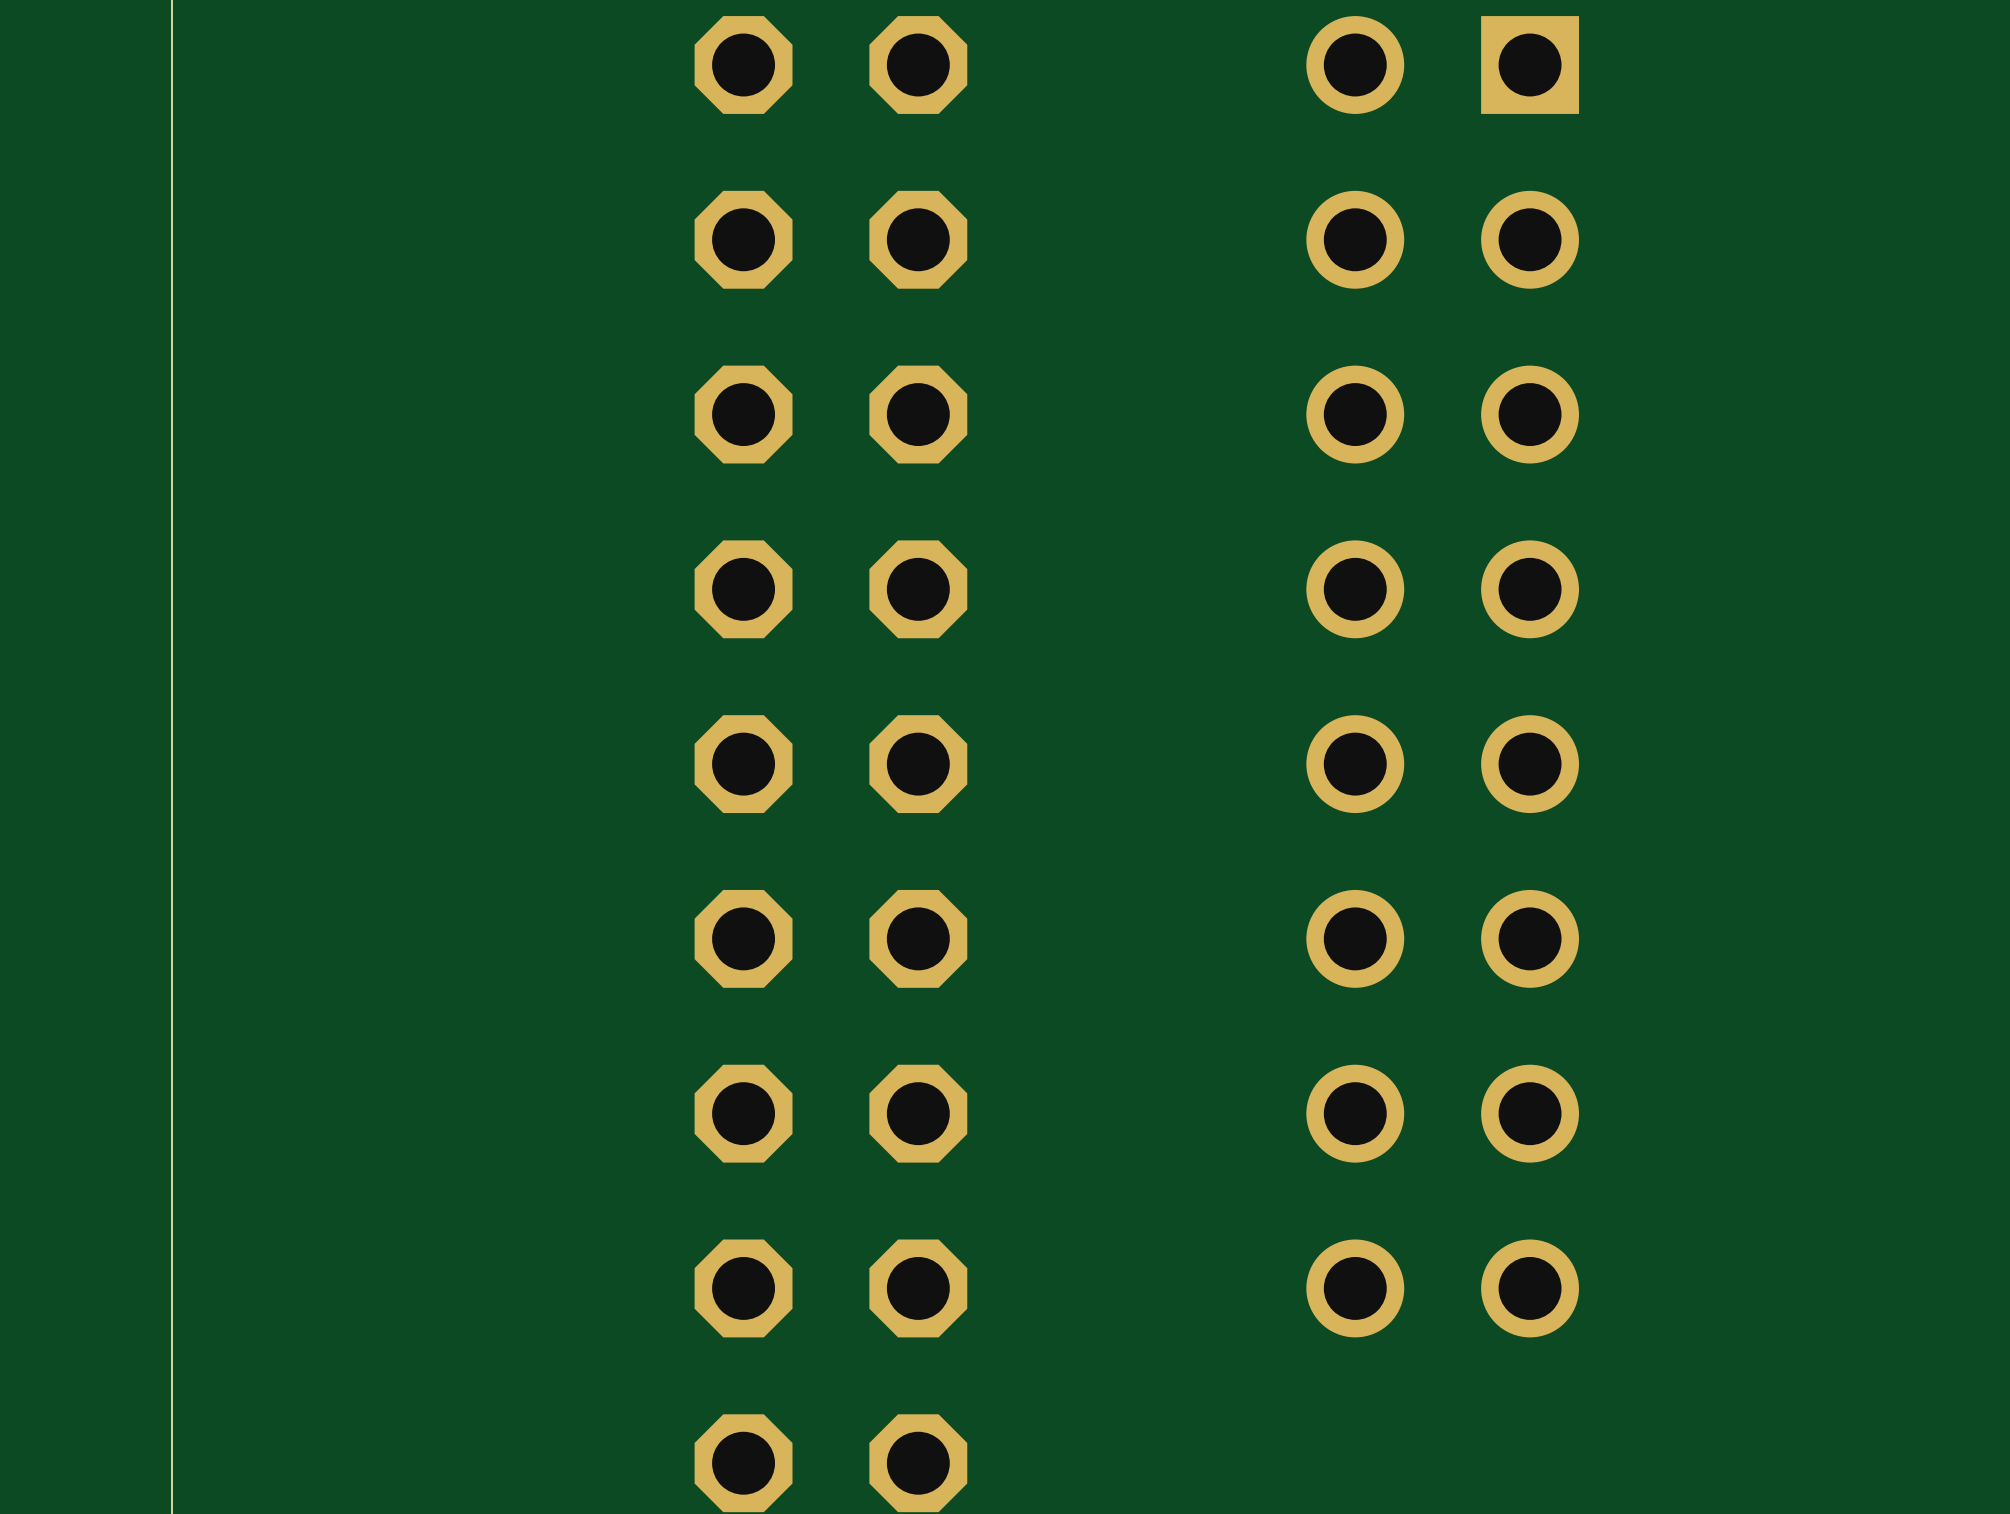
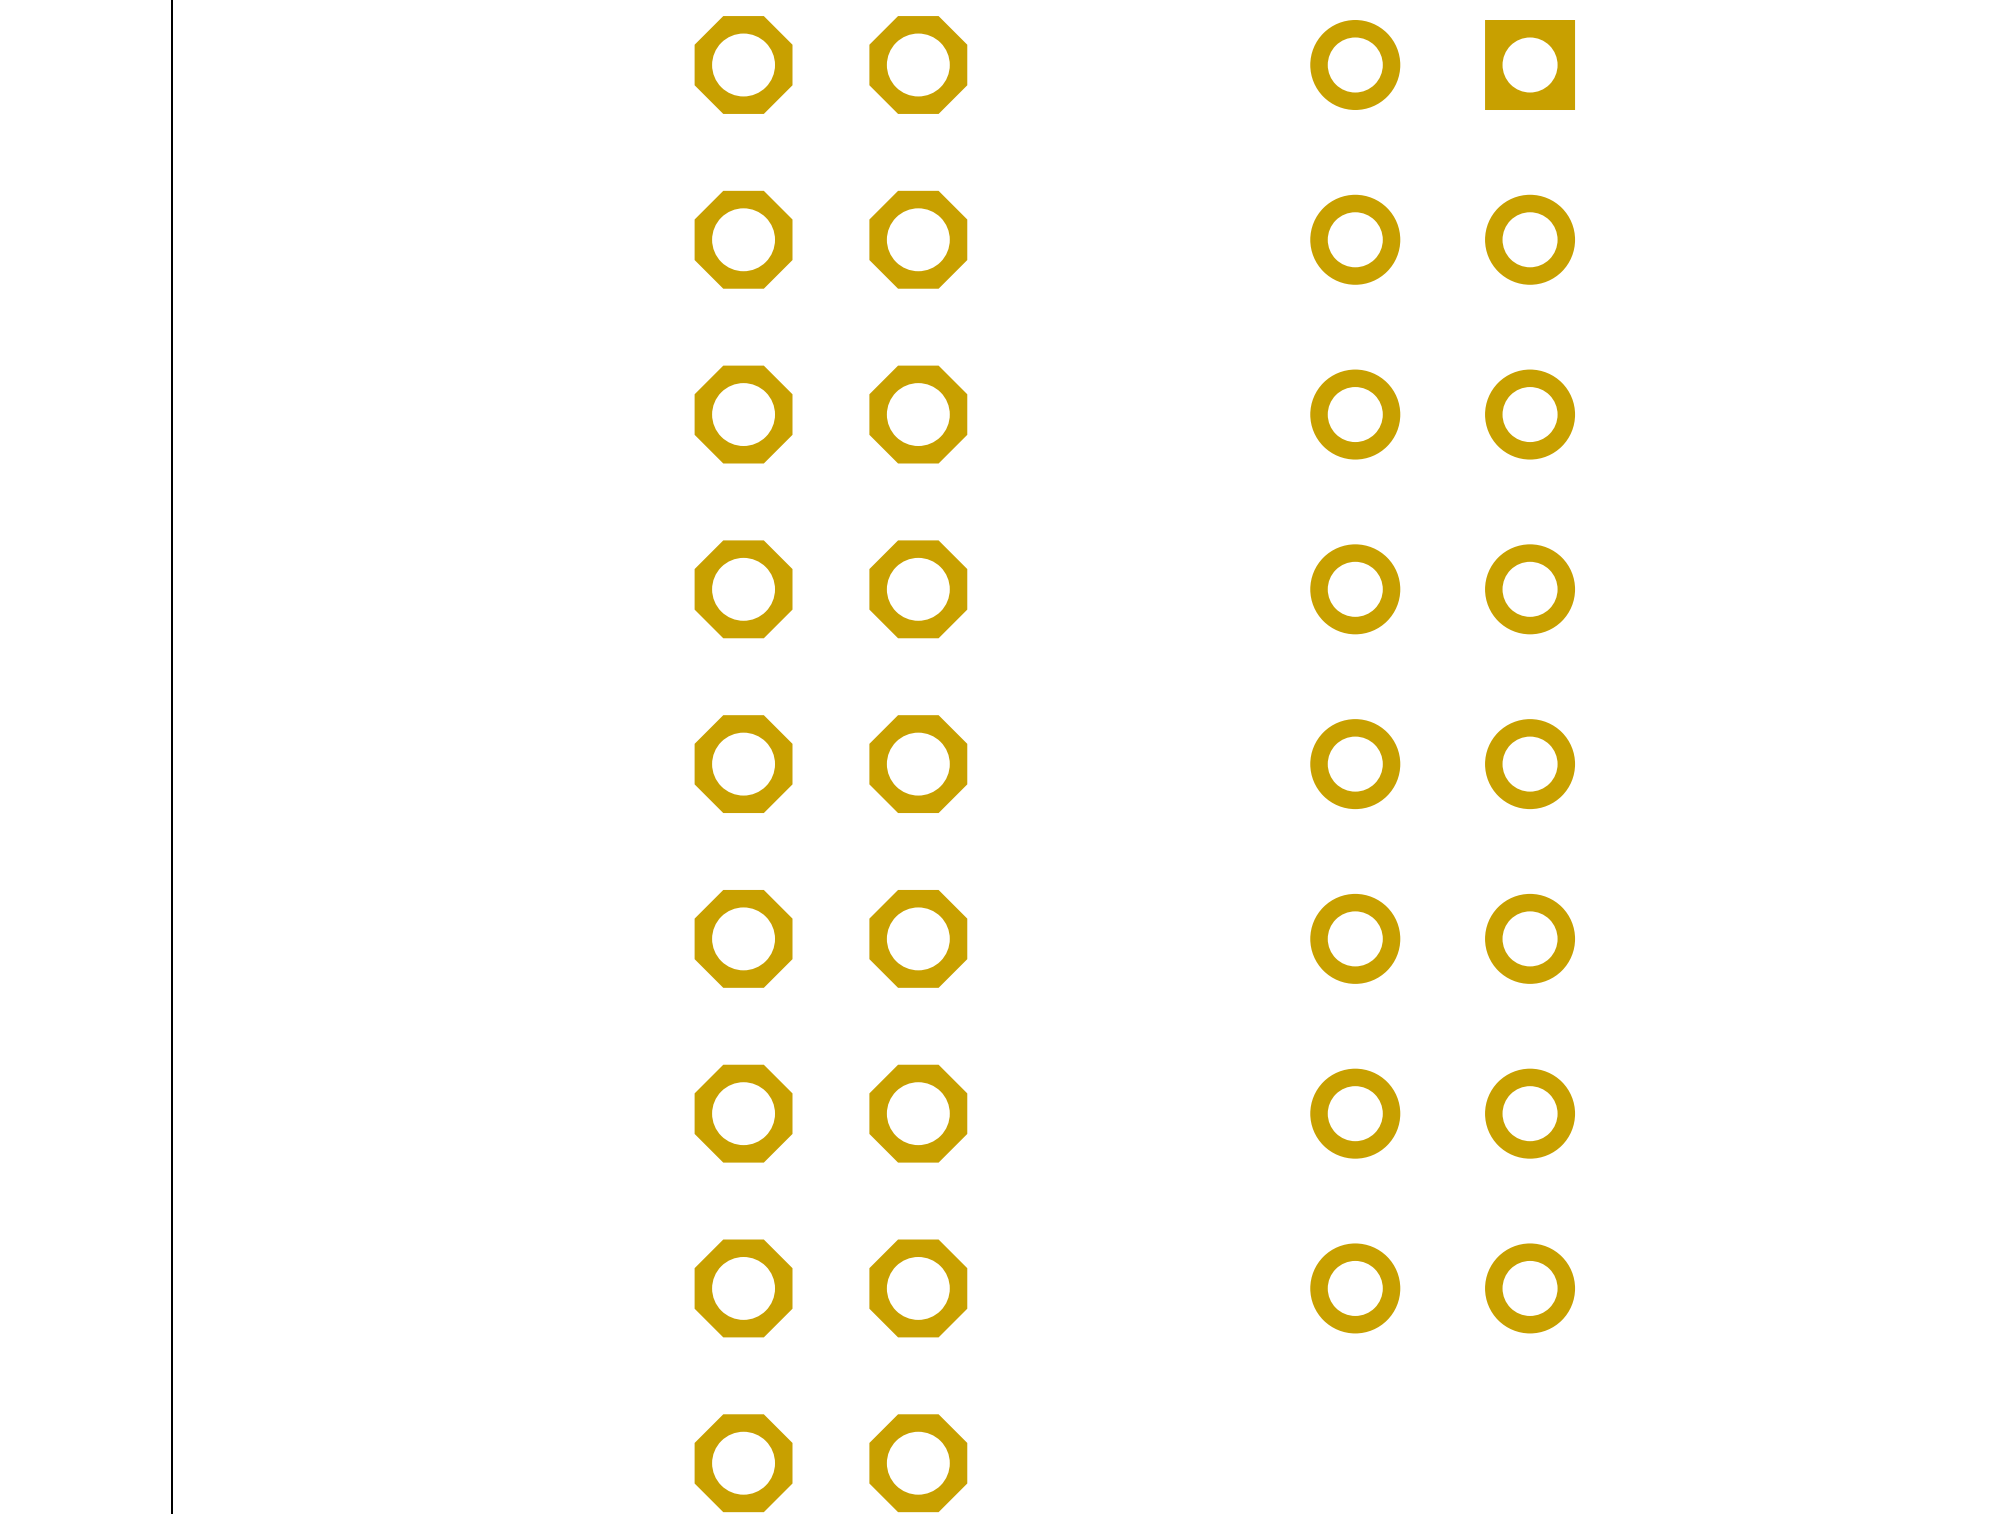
part footprint: [1306, 16, 1579, 1338] -> [1310, 19, 1576, 1334]

